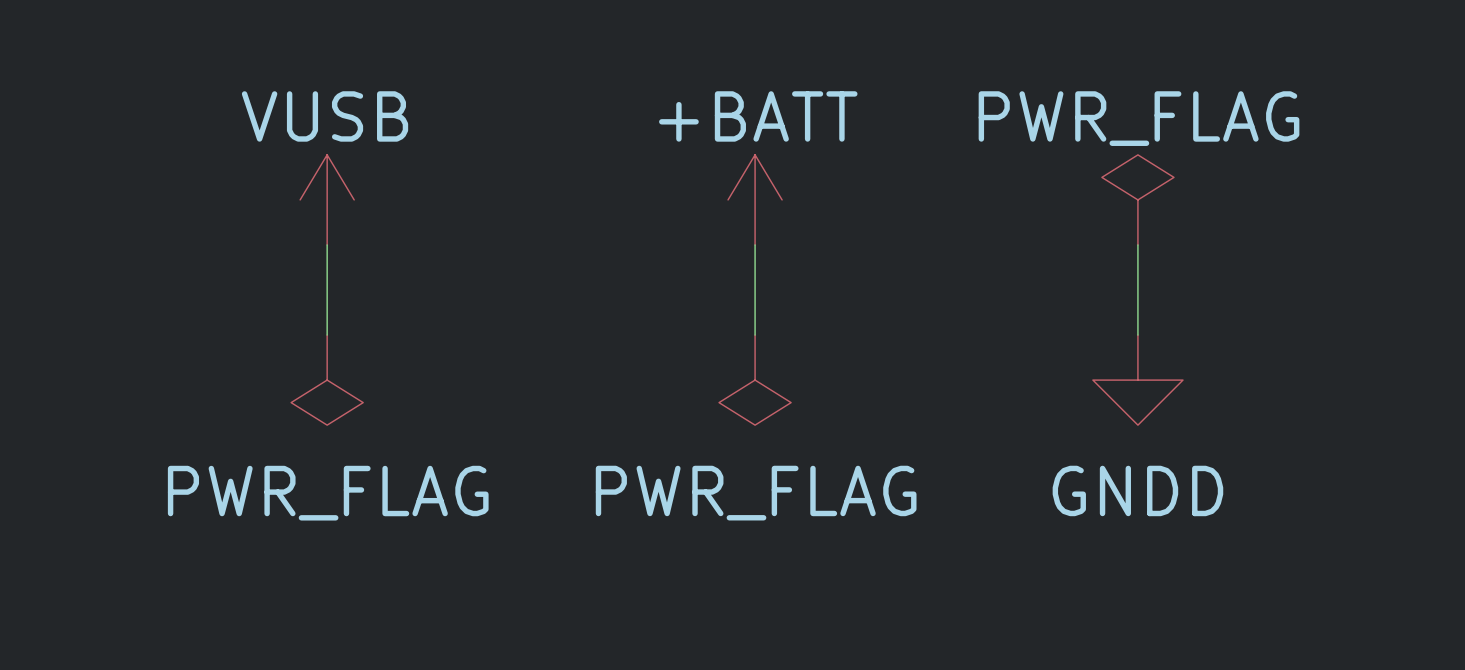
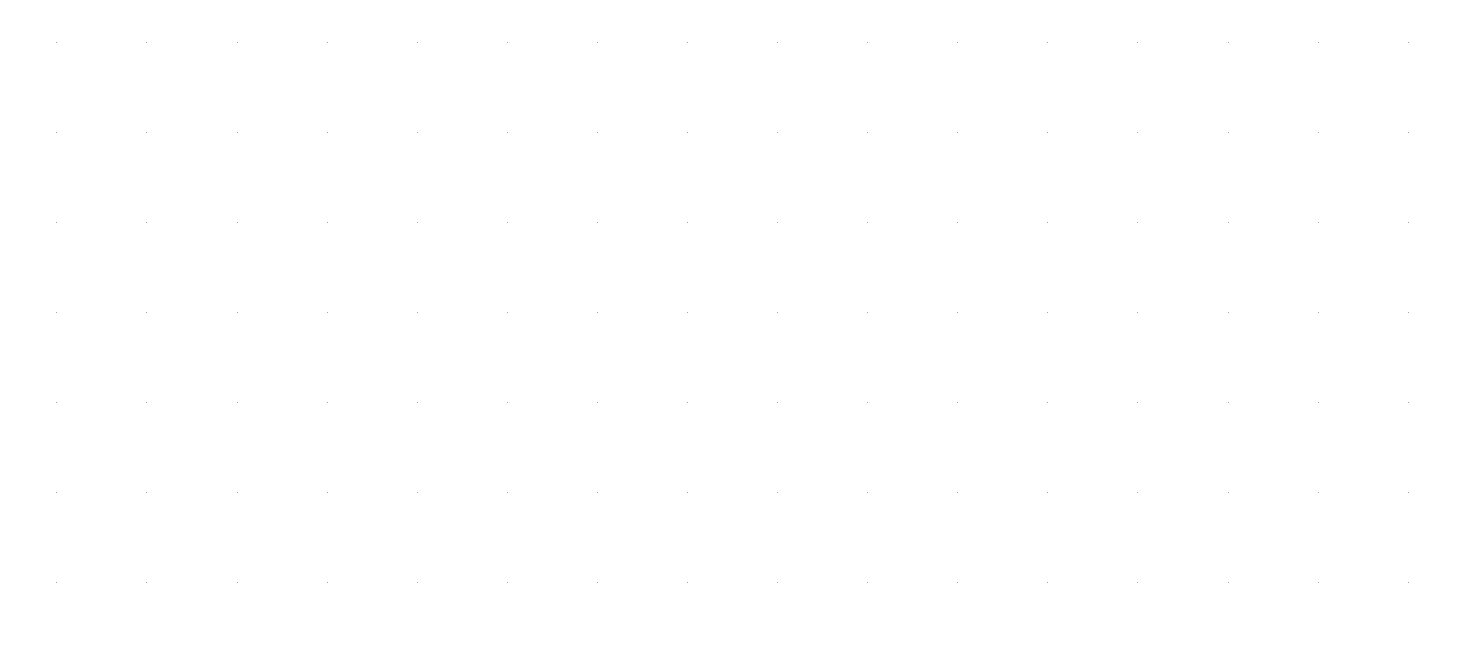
power symbol: VUSB (327, 199) -> none
power symbol: +BATT (755, 199) -> none
power symbol: PWR_FLAG (1137, 199) -> none
wire: (327, 244) (327, 335) -> none
wire: (755, 244) (755, 335) -> none
wire: (1137, 244) (1137, 335) -> none
power symbol: PWR_FLAG (327, 380) -> none
power symbol: PWR_FLAG (755, 380) -> none
power symbol: GNDD (1137, 380) -> none

